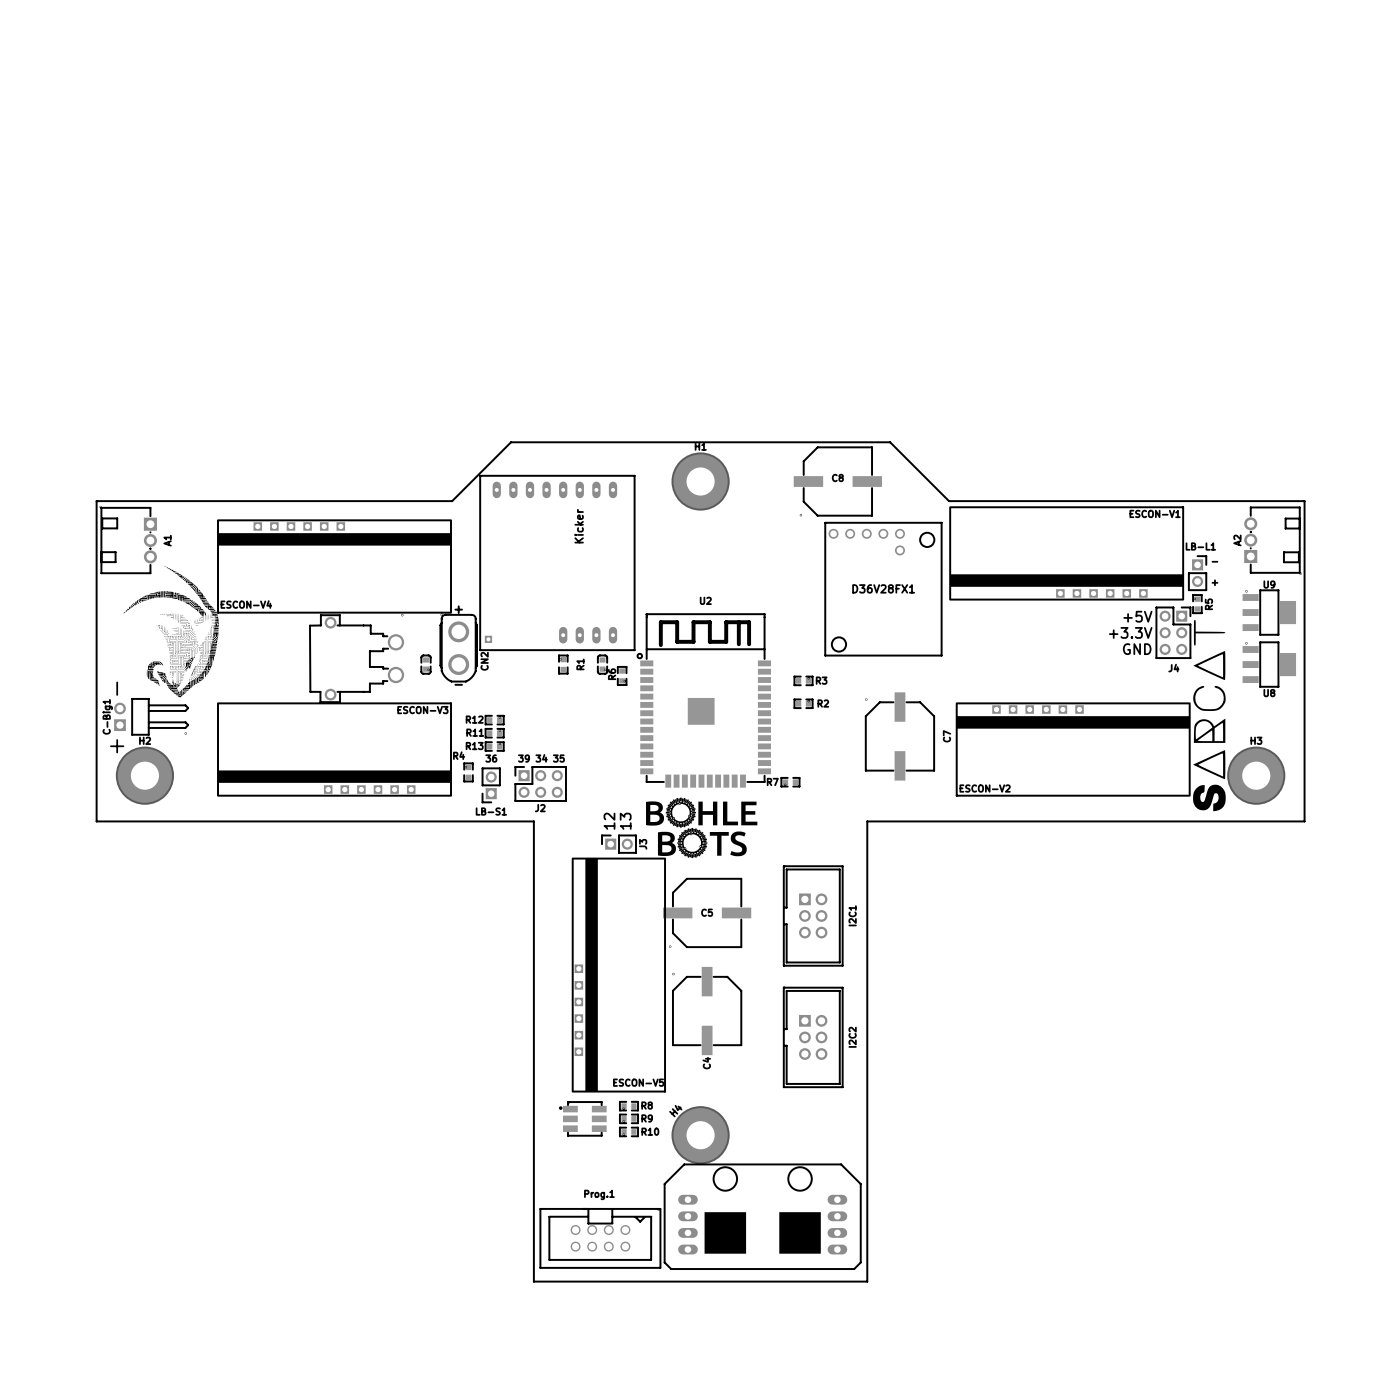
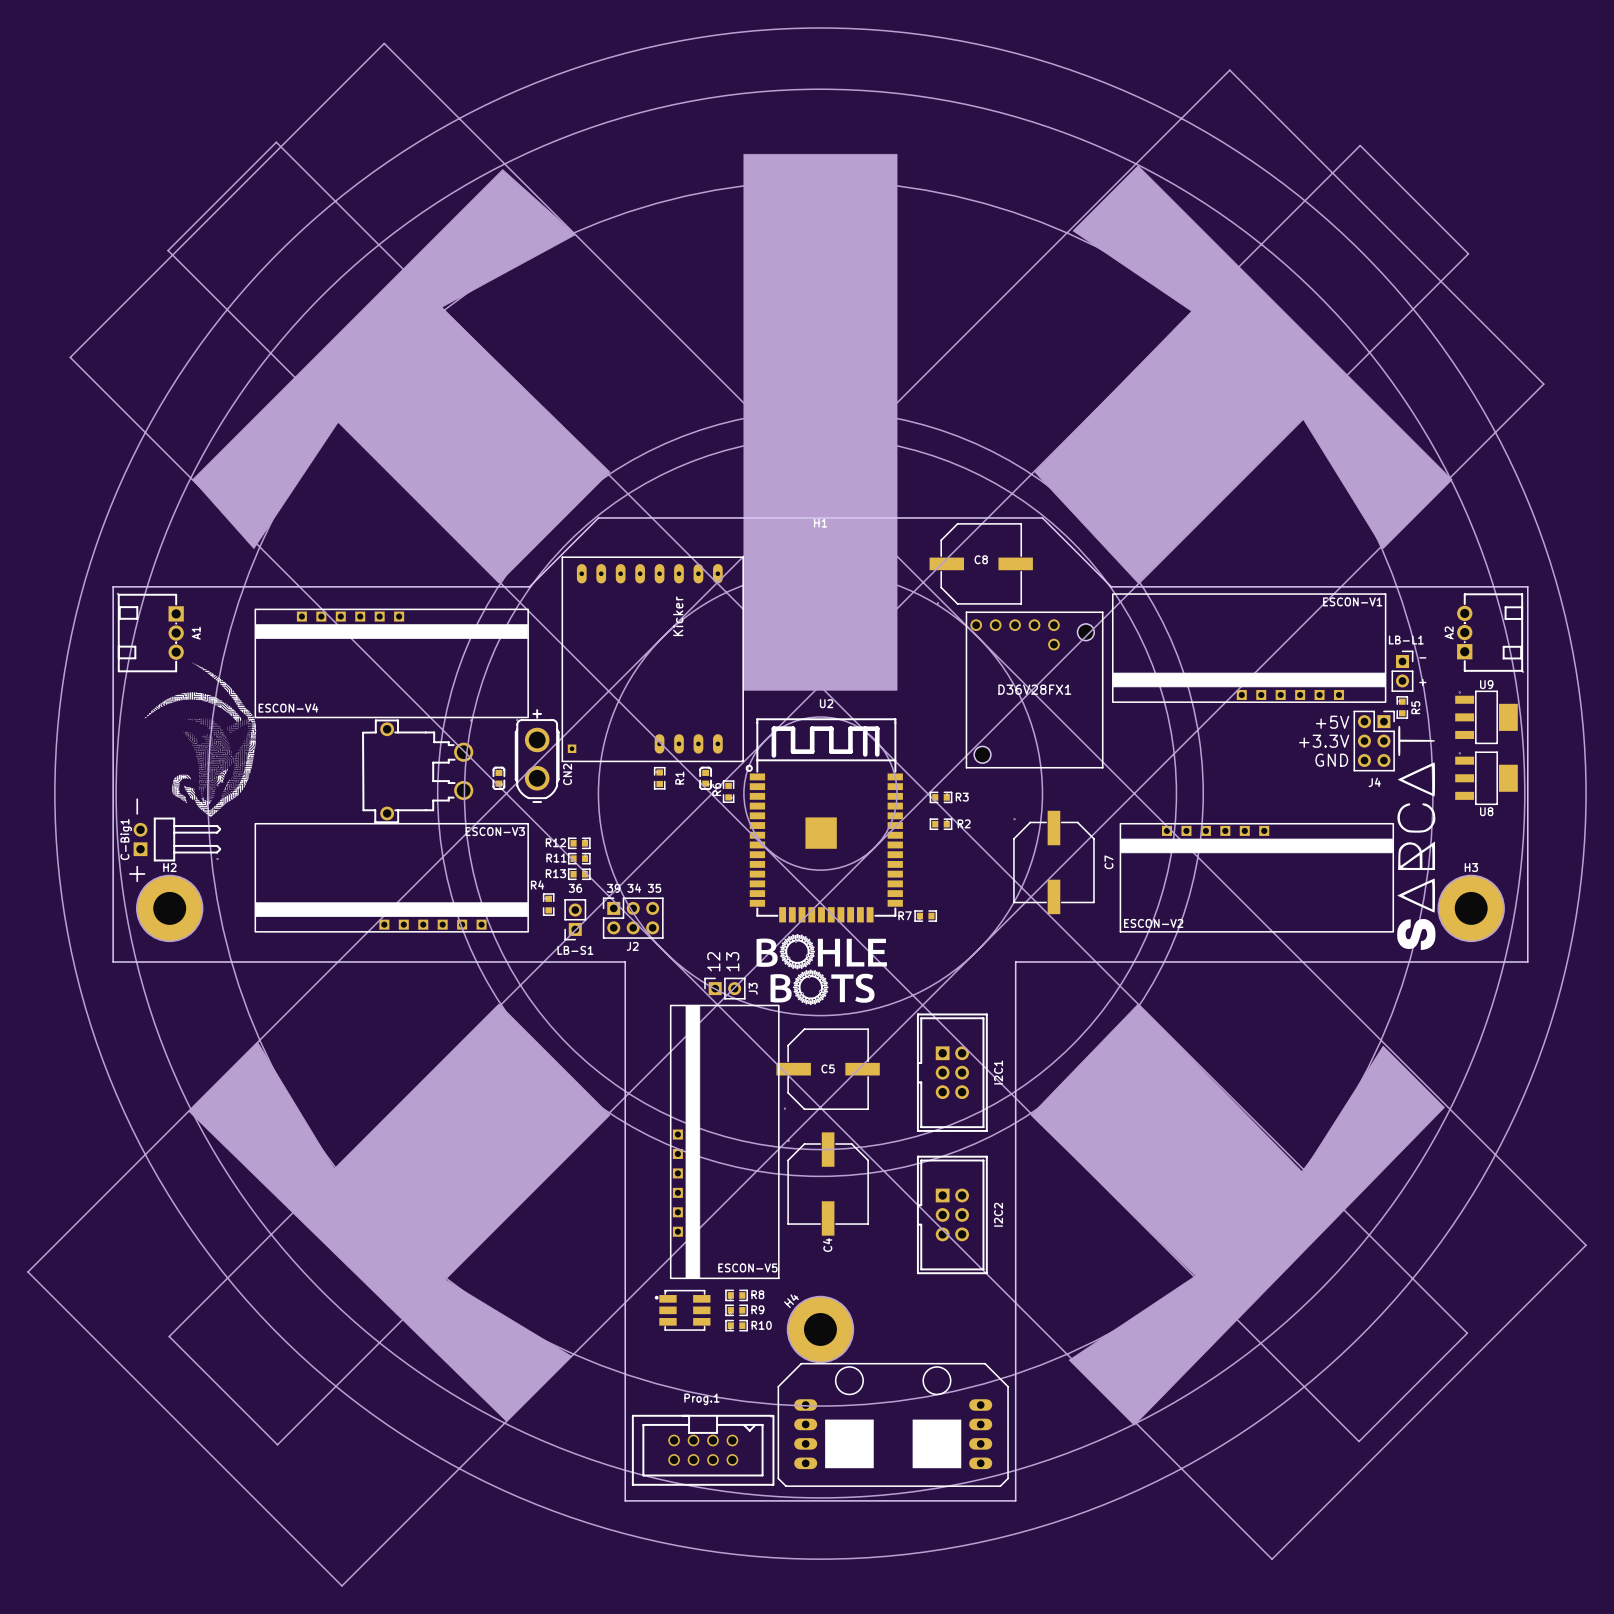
drawing: none -> [54, 27, 1587, 1560]
line: none -> (384, 43) (70, 357) (1272, 1559) (1586, 1245) (384, 43)
line: none -> (1229, 70) (27, 1271) (341, 1585) (1543, 384) (1229, 70)
line: none -> (276, 142) (168, 250) (1359, 1441) (1467, 1333) (276, 142)
line: none -> (1360, 145) (169, 1336) (277, 1444) (1468, 253) (1360, 145)

